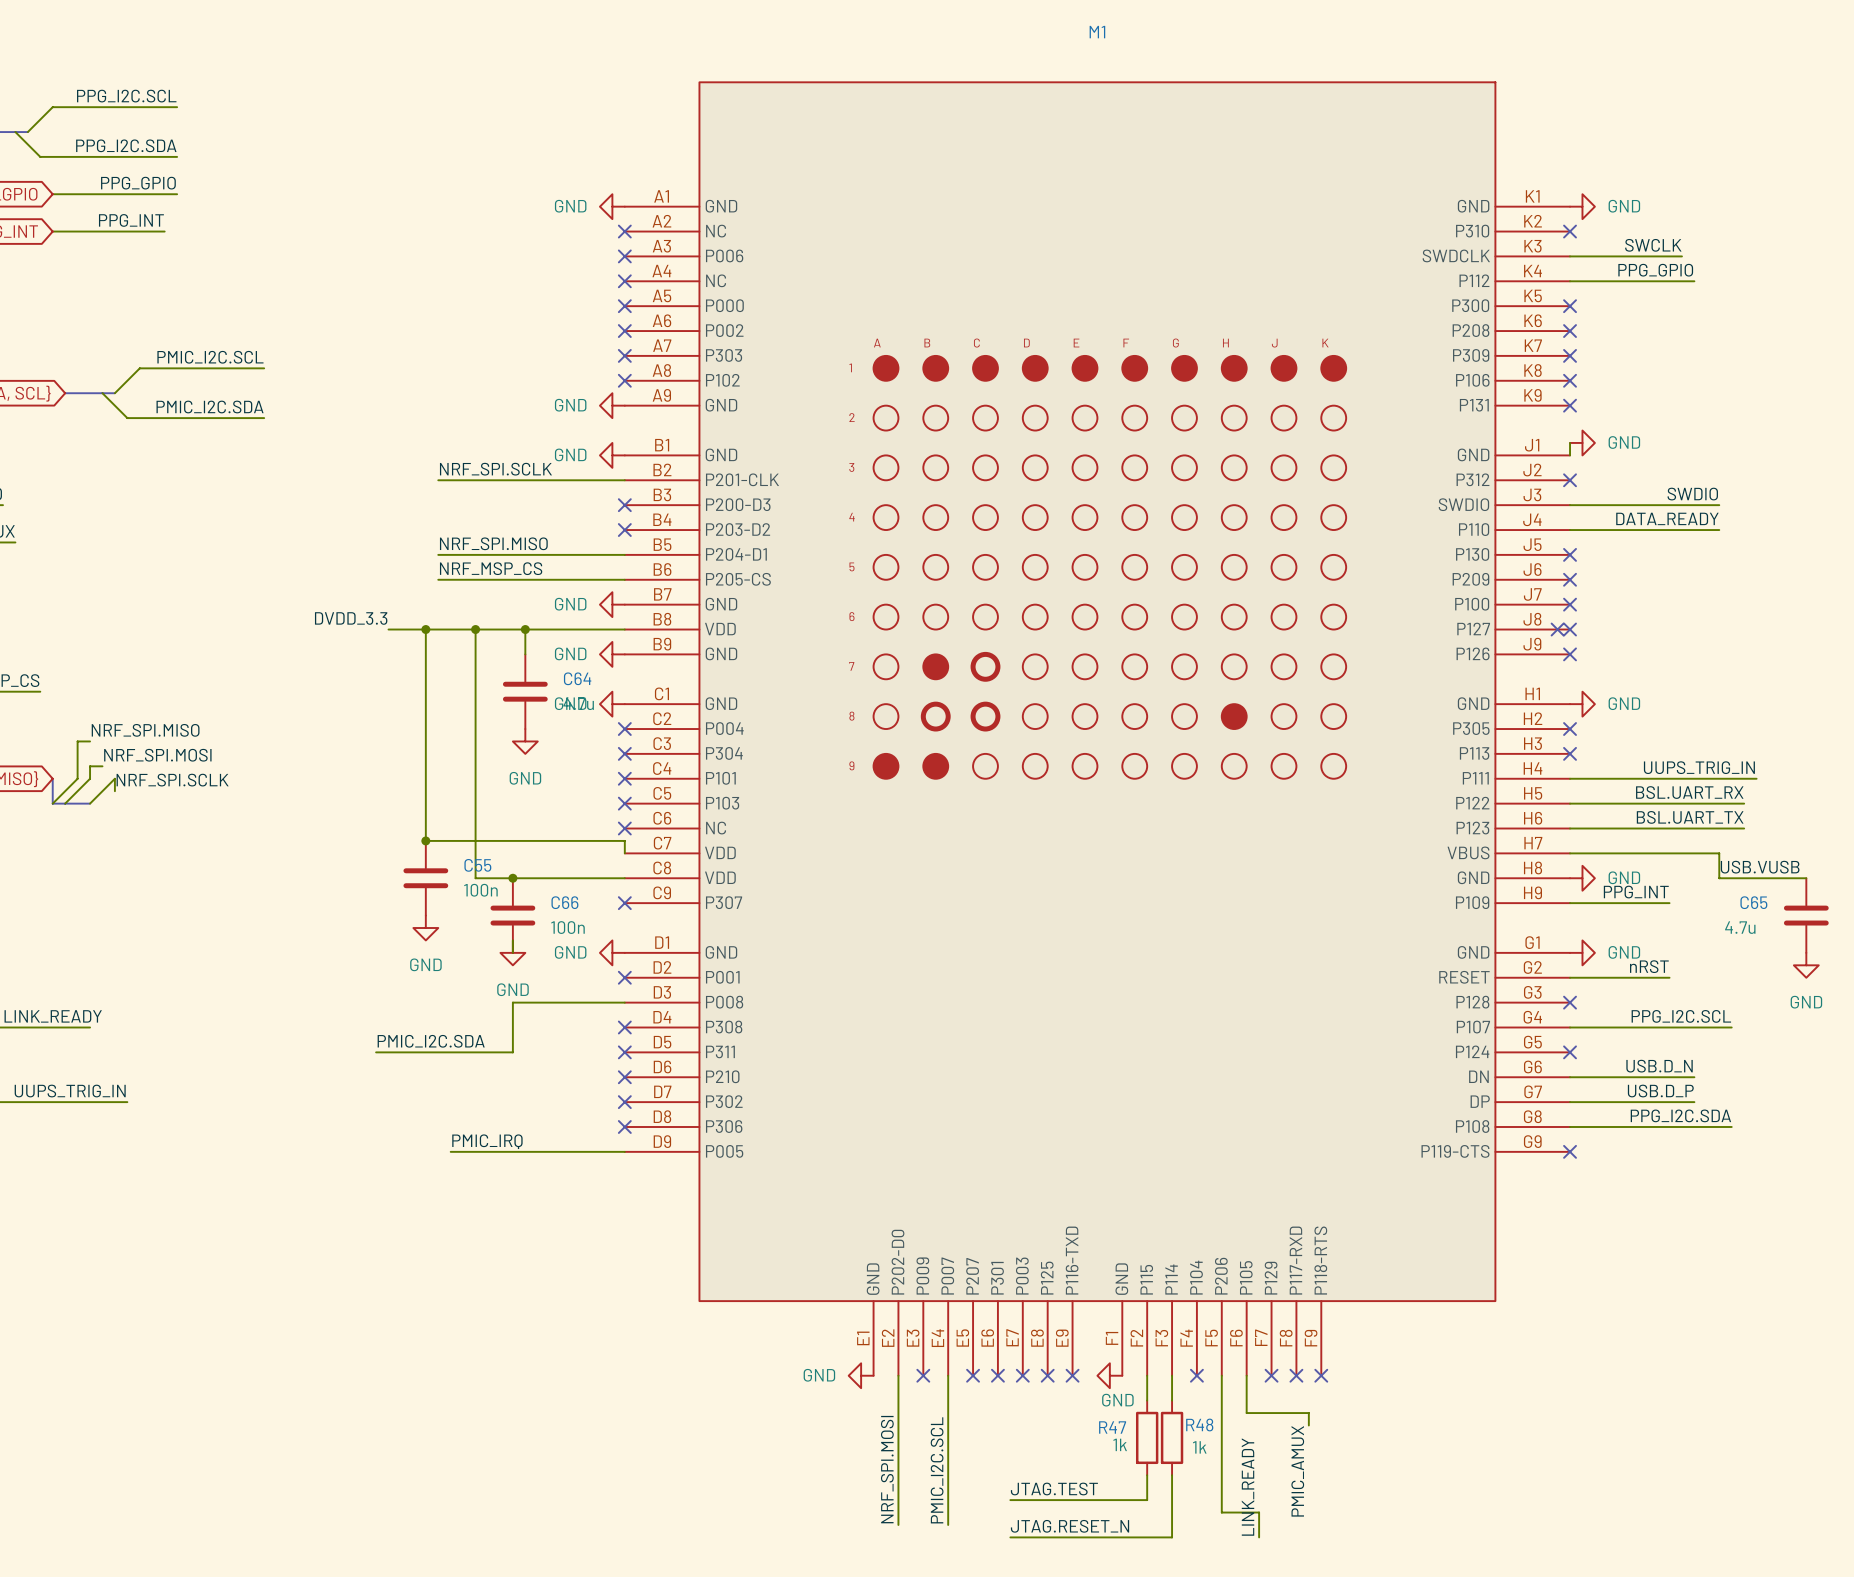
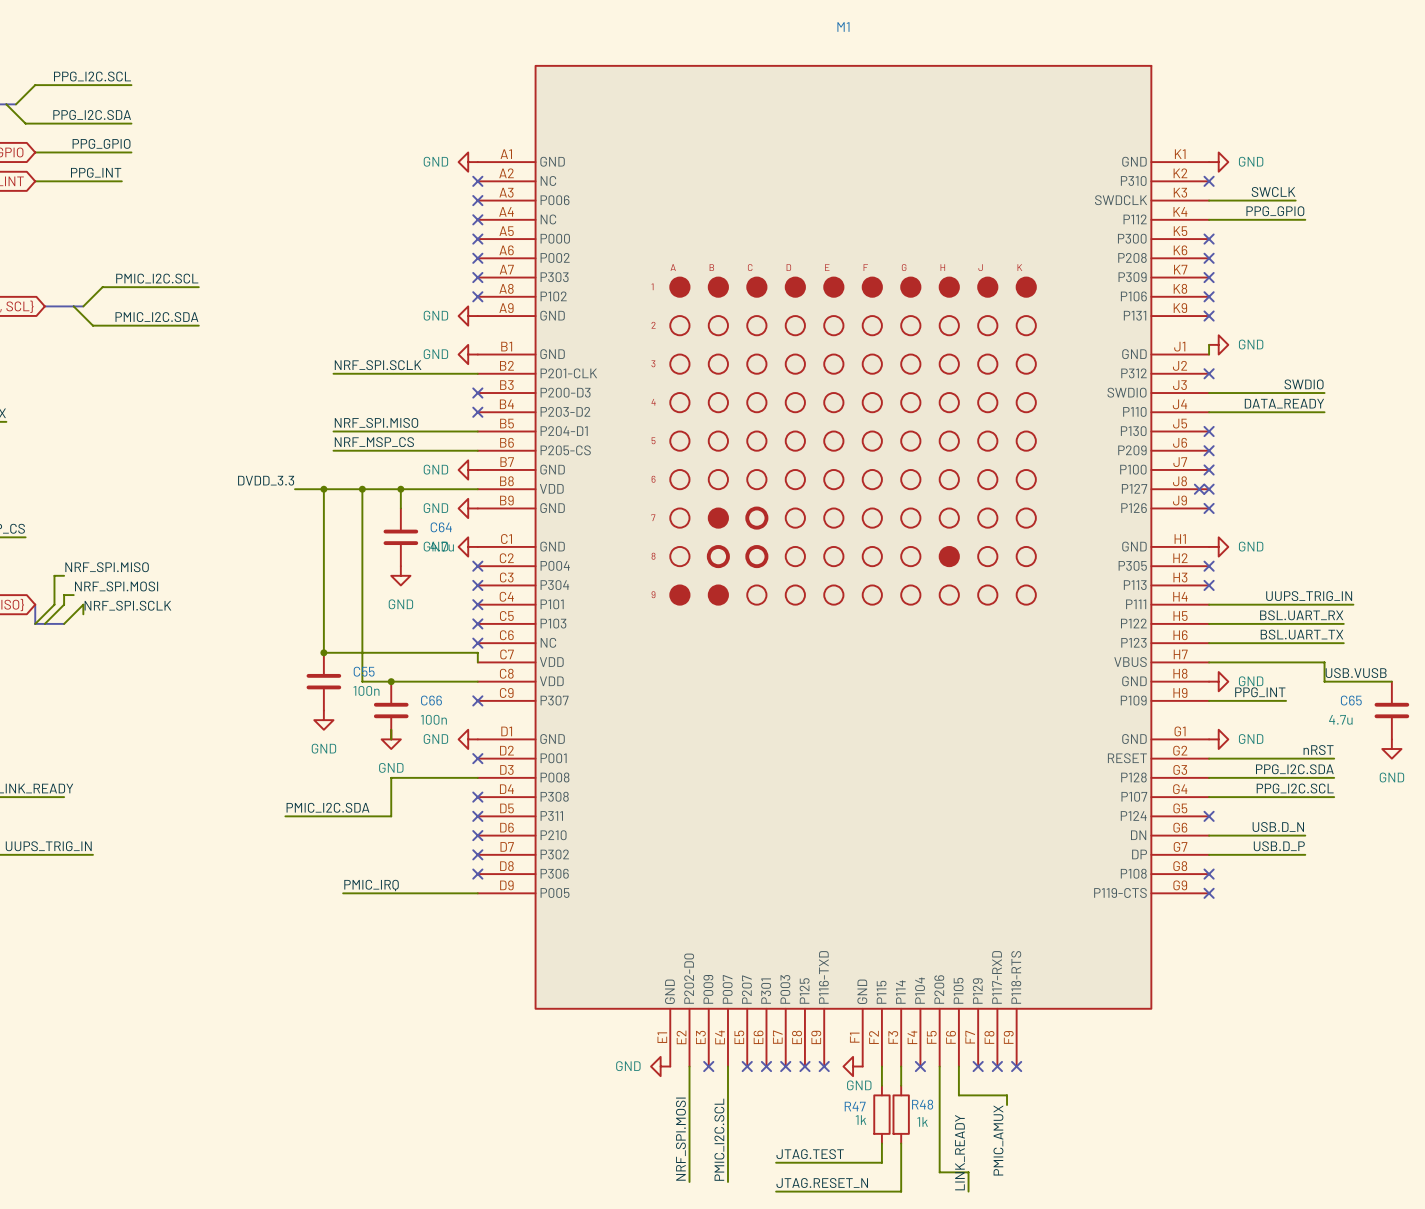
label position: nRST (1649, 966) -> nRST (1318, 750)
wire: none -> (1286, 758) (1334, 758)
no-connect mark: (1570, 1002) -> none
label position: PPG_I2C.SDA (1680, 1115) -> PPG_I2C.SDA (1294, 769)
wire: (1570, 1126) (1731, 1126) -> (1209, 777) (1334, 777)
no-connect mark: none -> (1209, 874)

